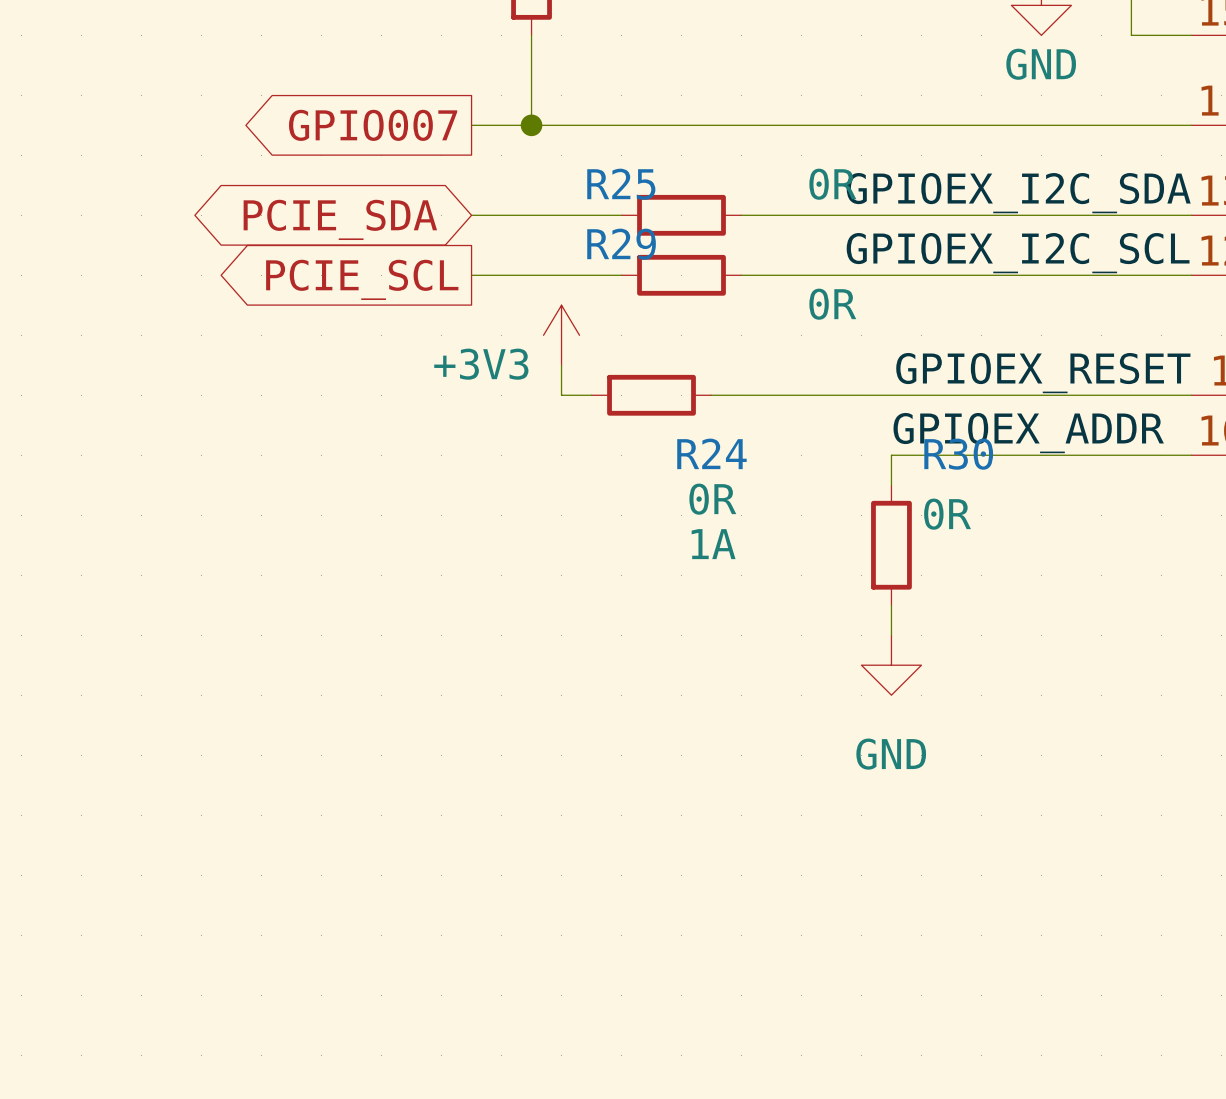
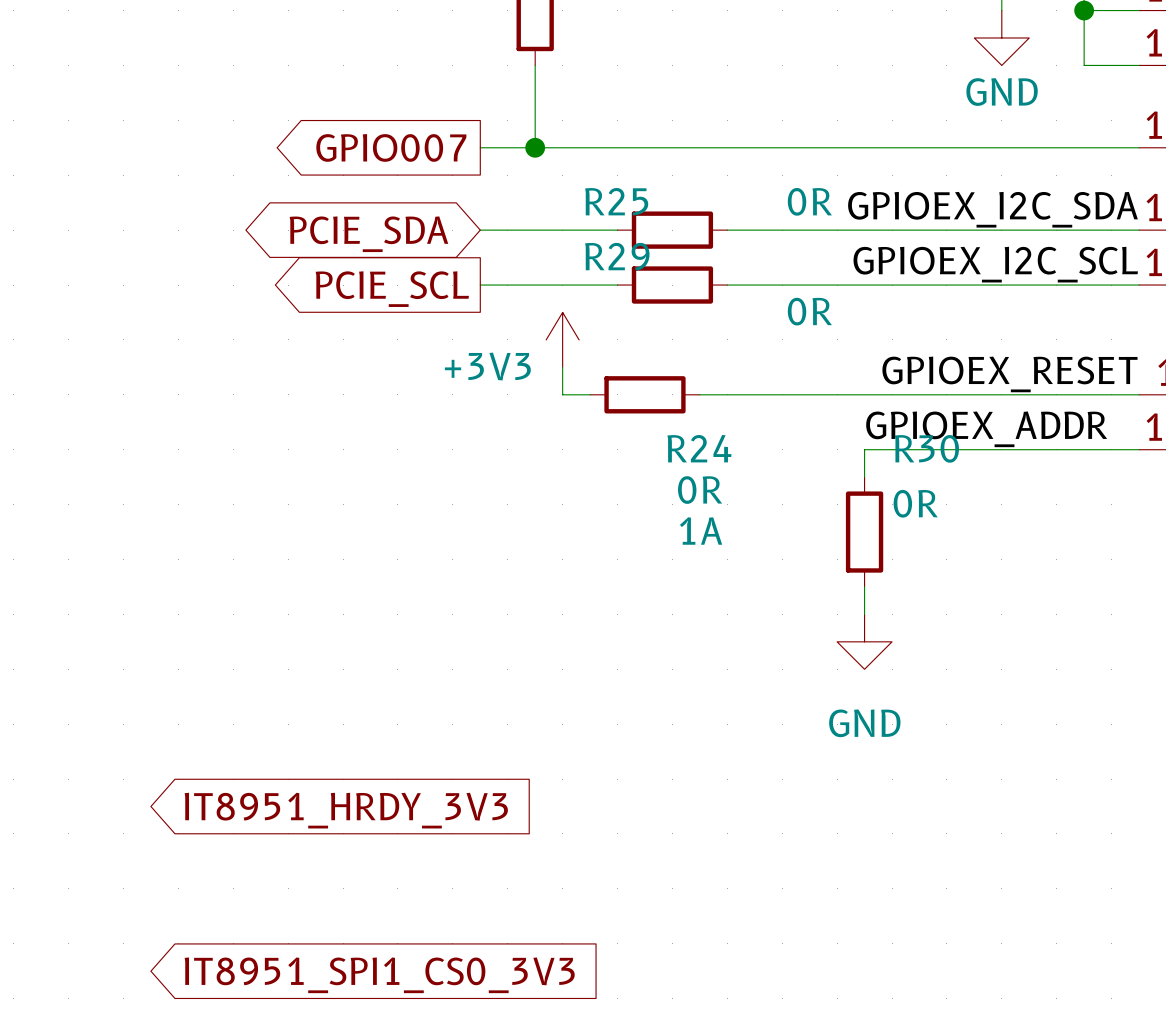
global label: none -> IT8951_HRDY_3V3 (346, 810)
global label: none -> IT8951_SPI1_CS0_3V3 (379, 975)

